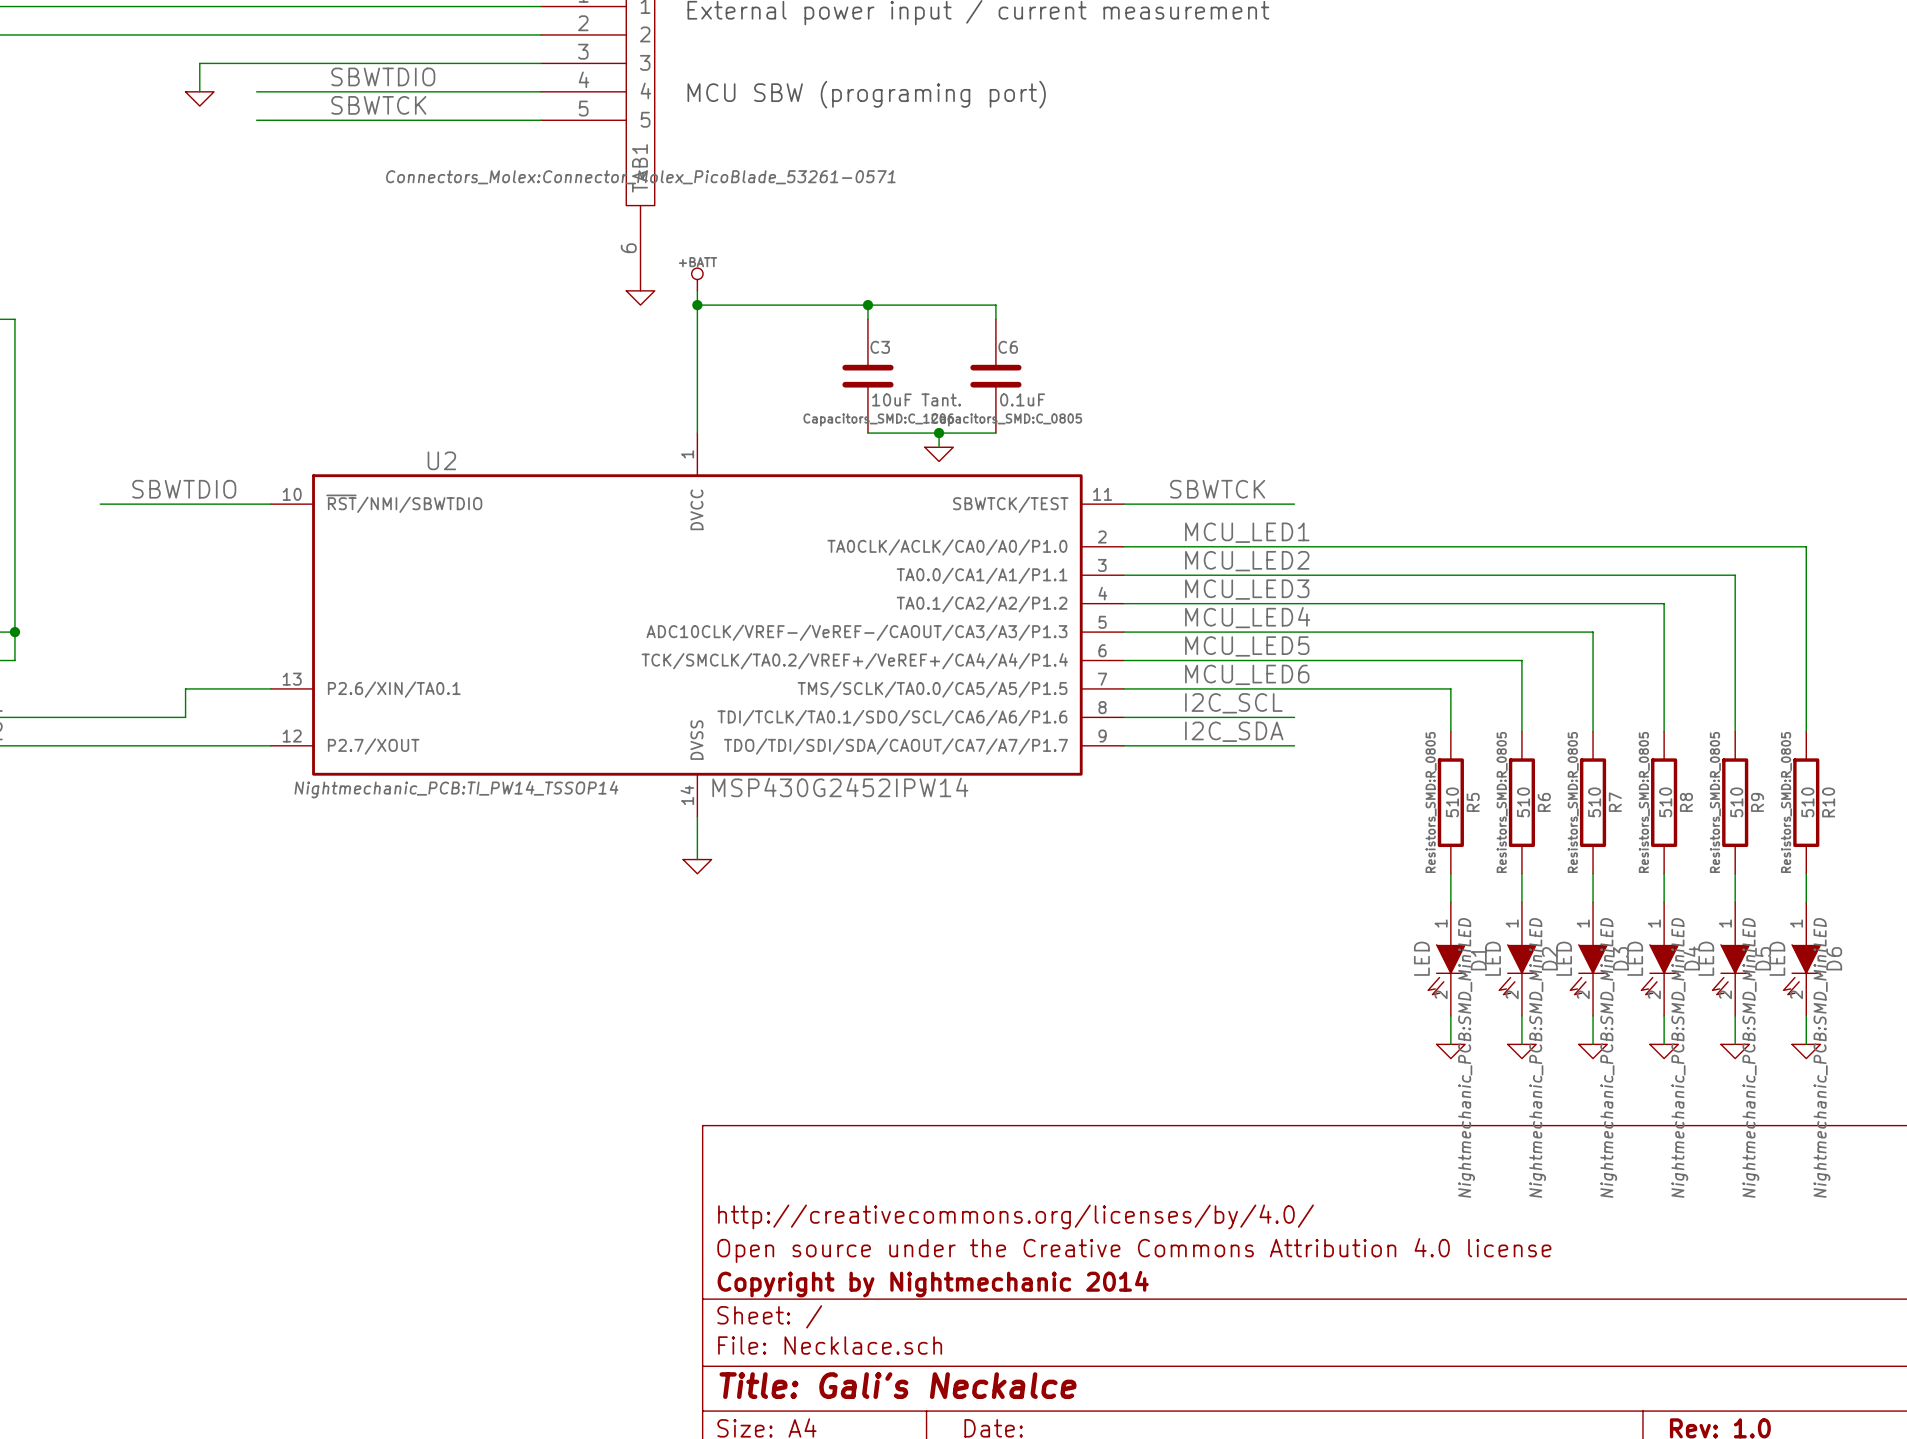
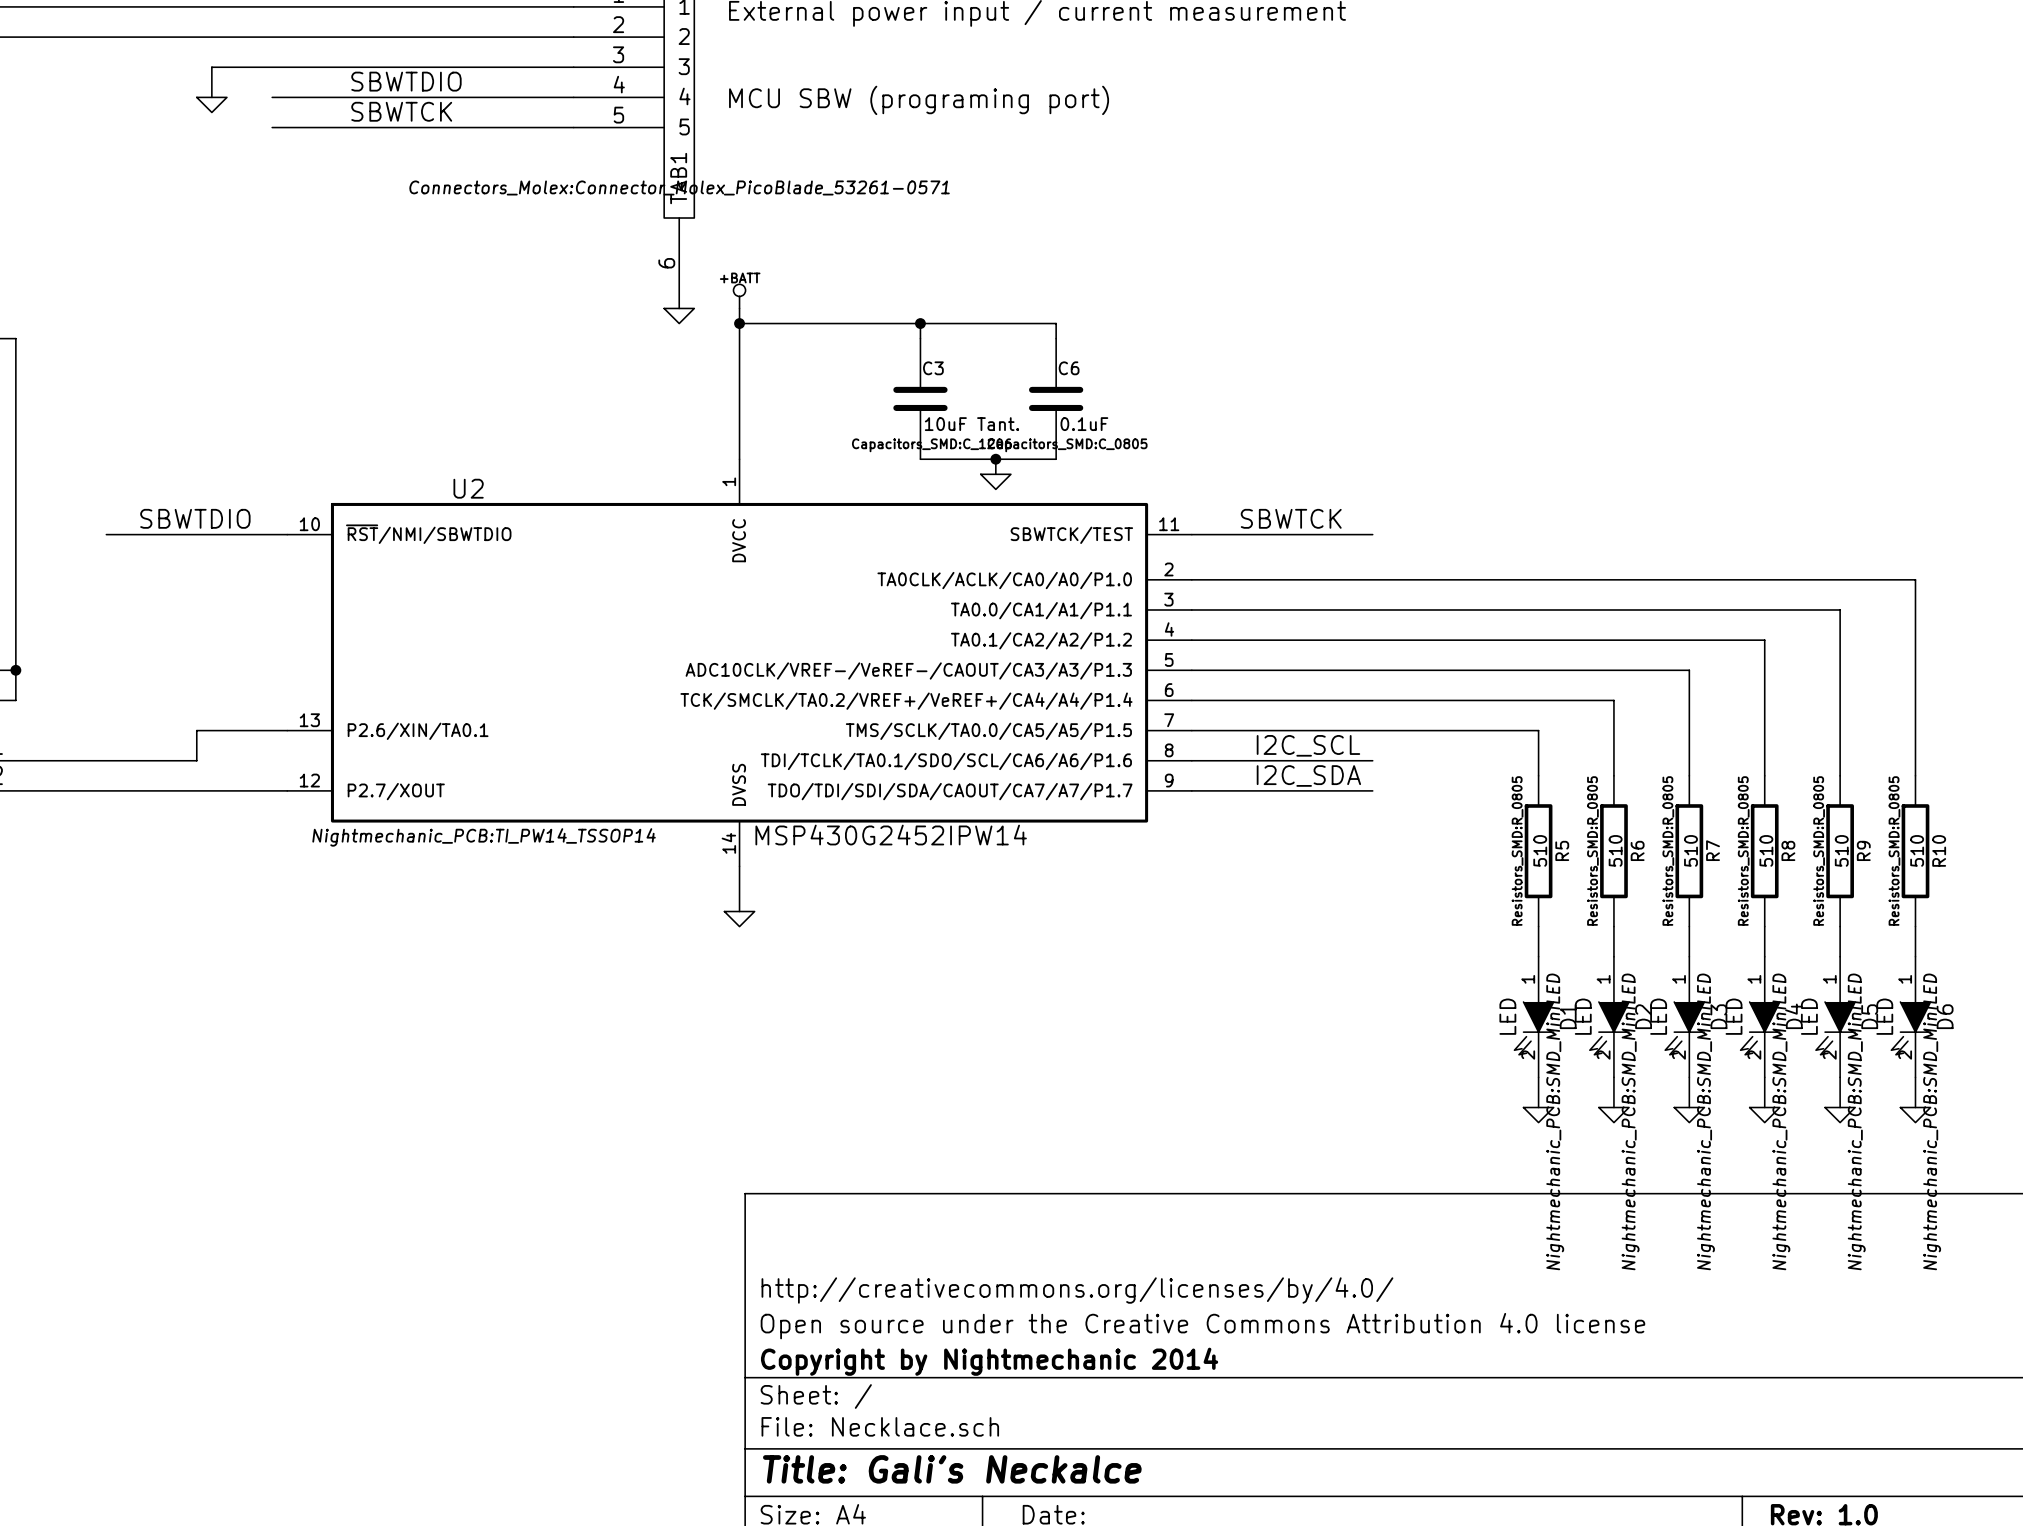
label: MCU_LED1 (1247, 532) -> none
label: MCU_LED2 (1247, 561) -> none
label: MCU_LED3 (1247, 589) -> none
label: MCU_LED4 (1247, 617) -> none
label: MCU_LED5 (1247, 646) -> none
label: MCU_LED6 (1247, 674) -> none

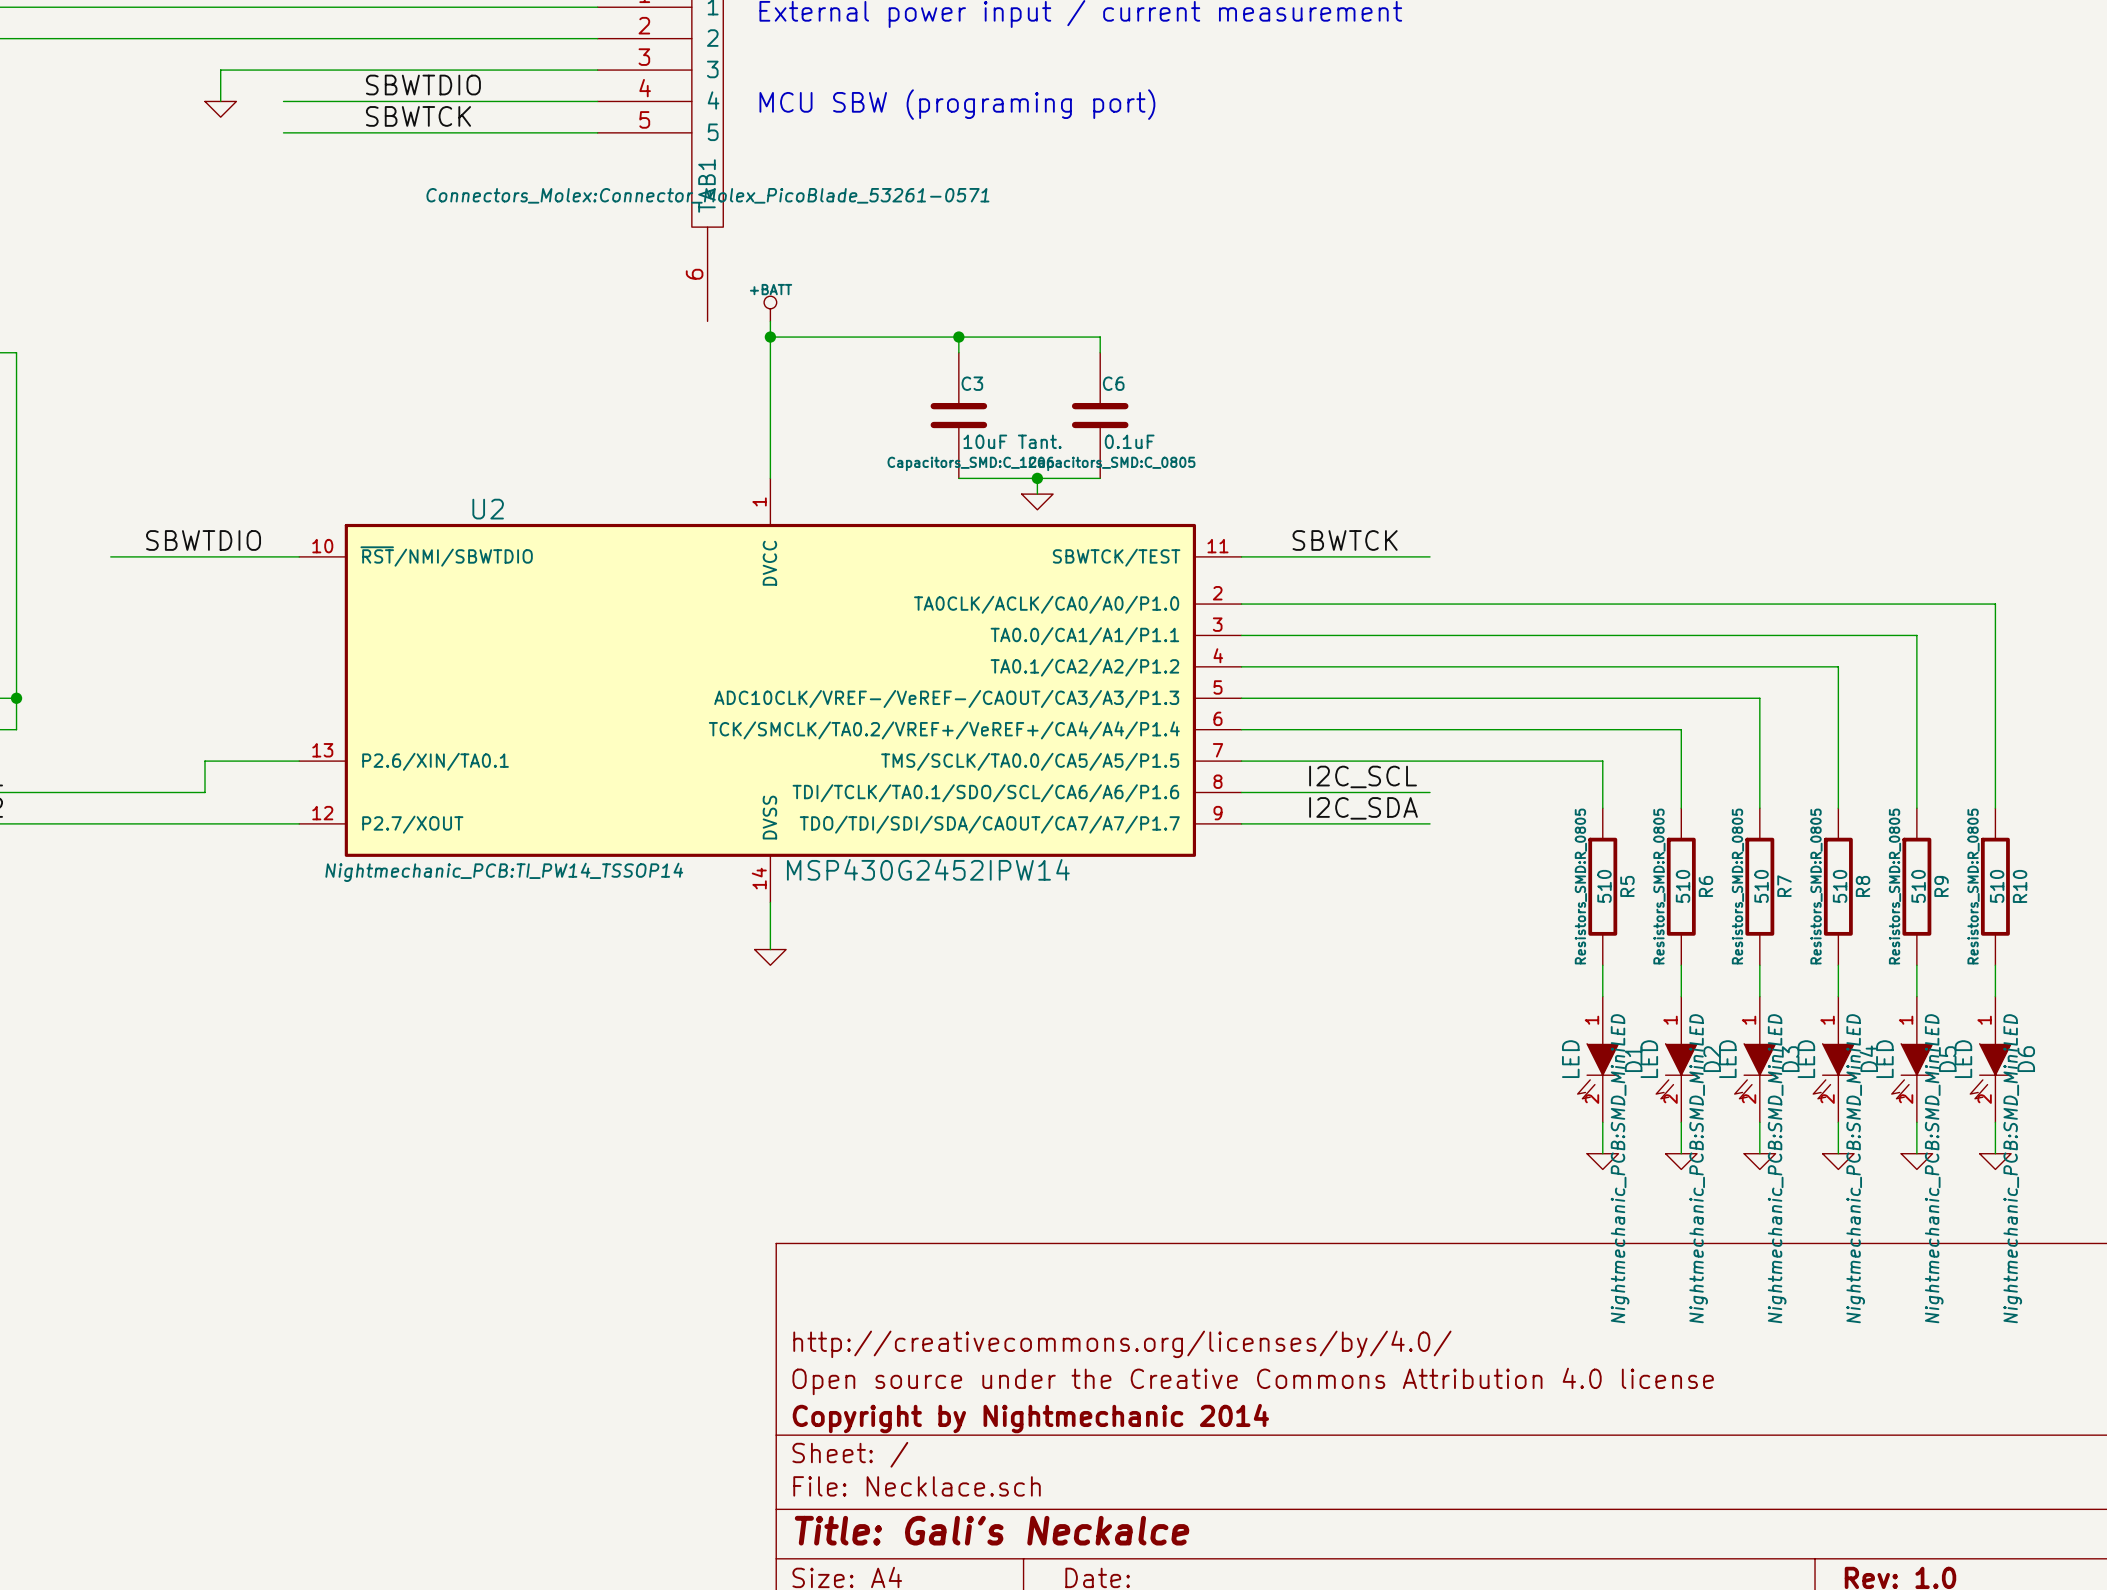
power symbol: (679, 316) -> none

